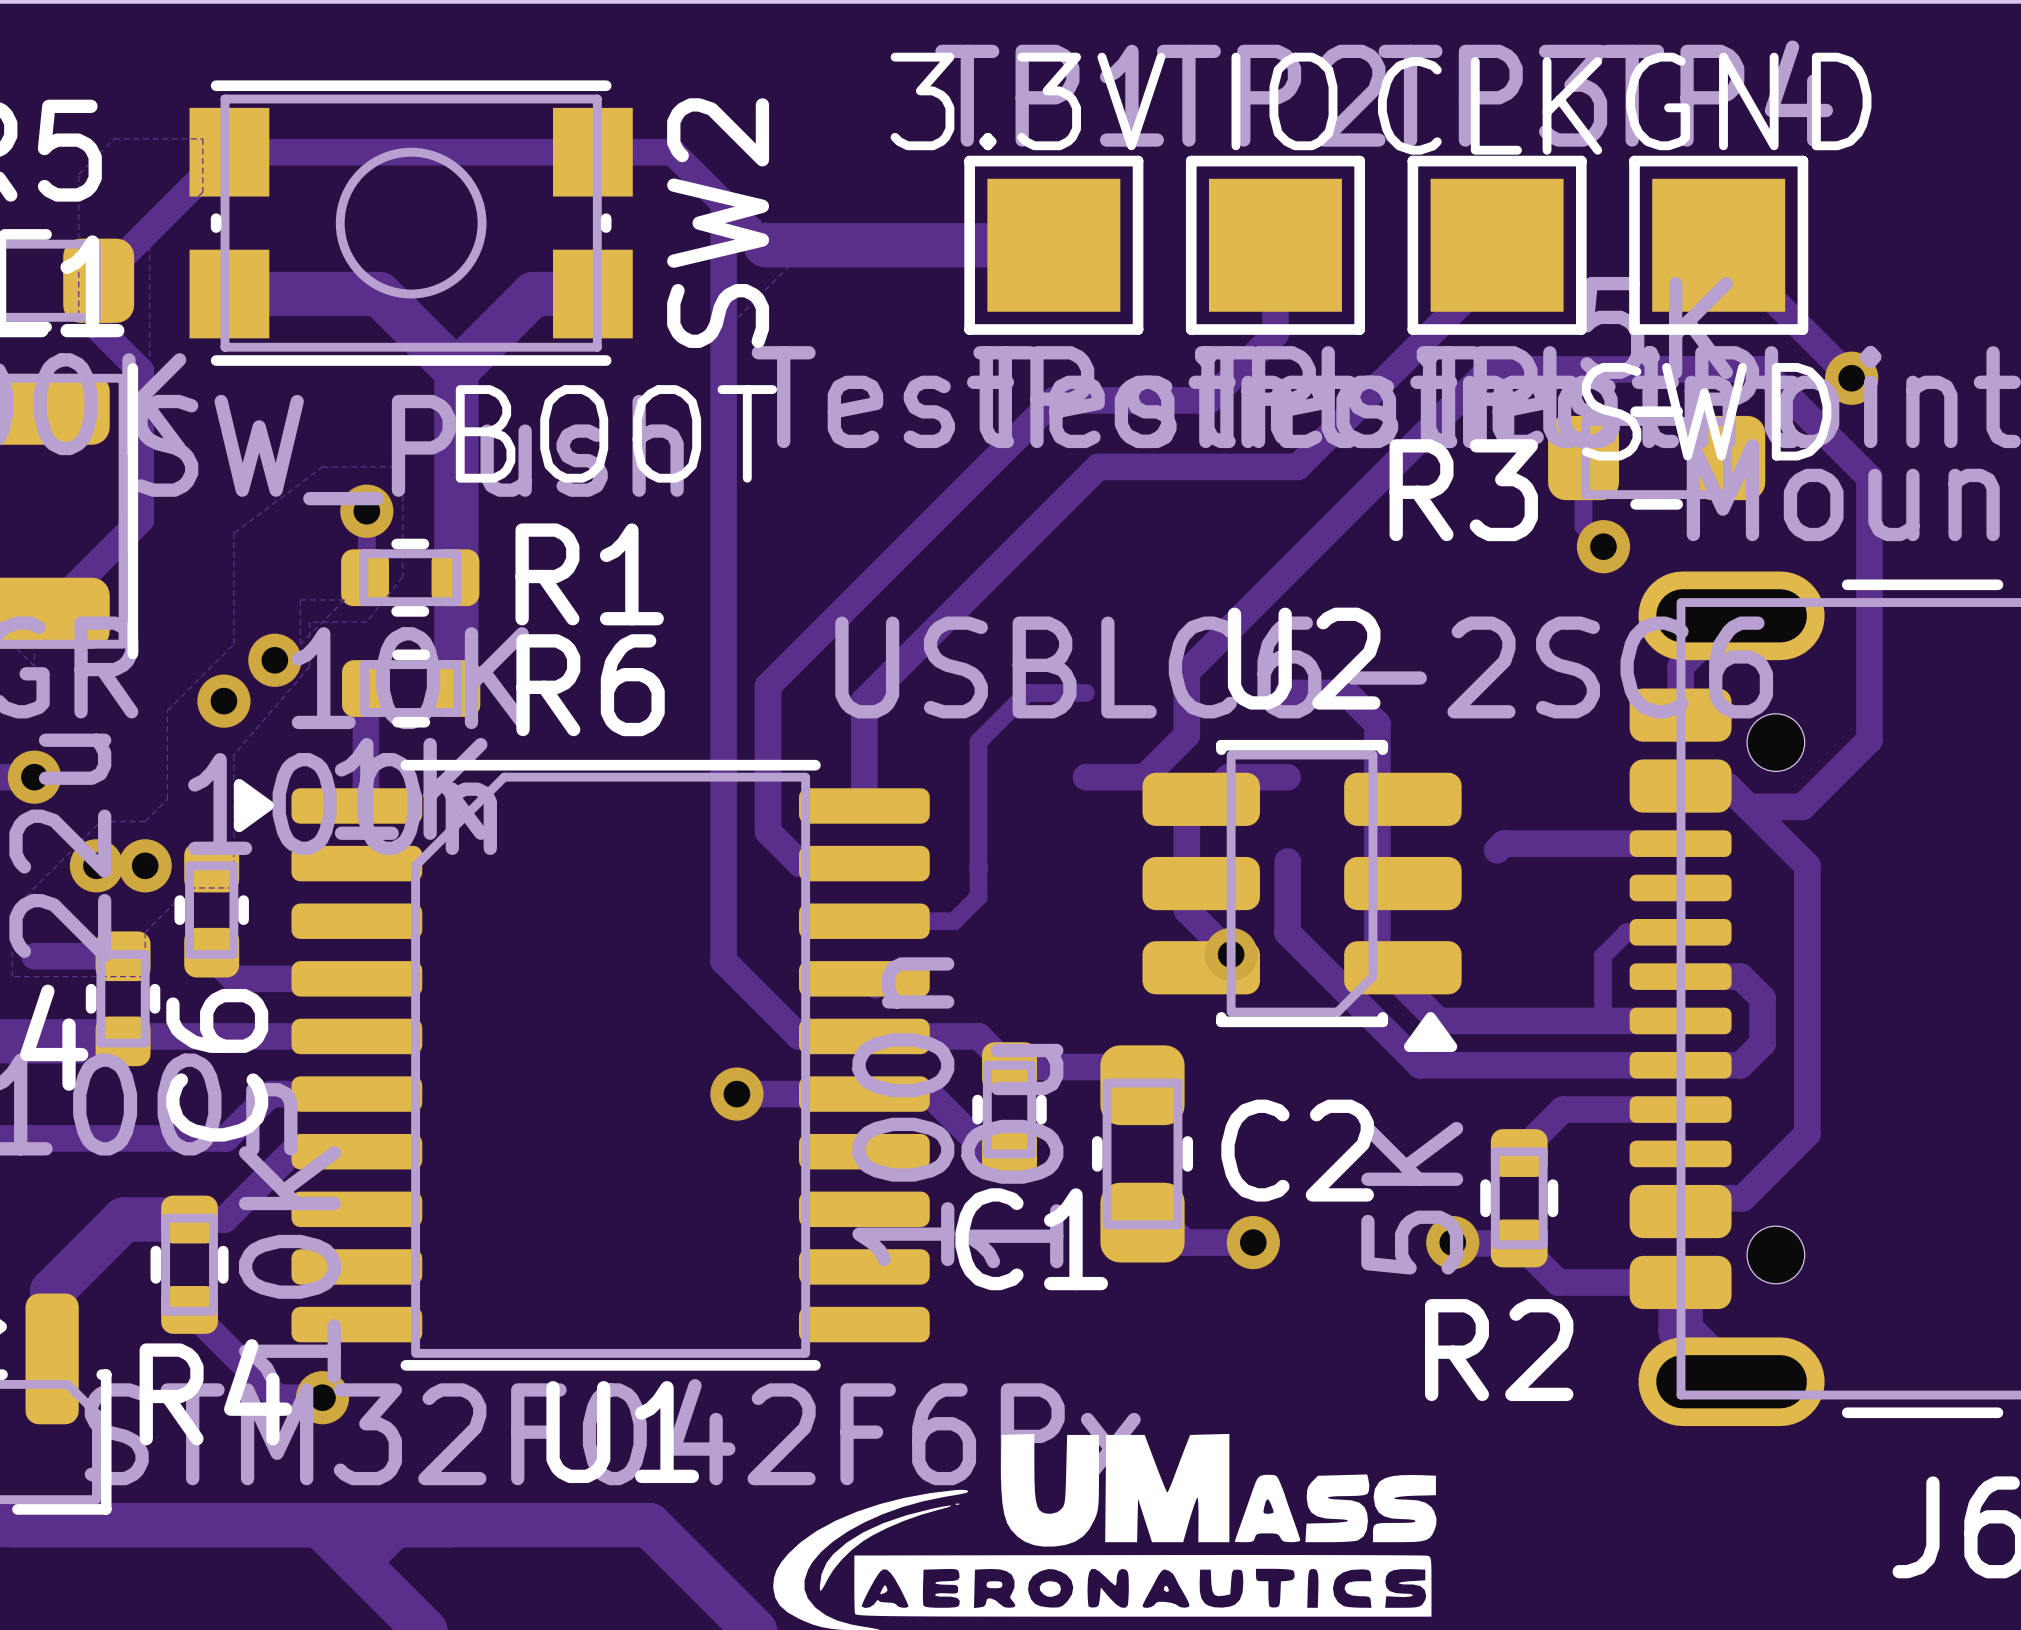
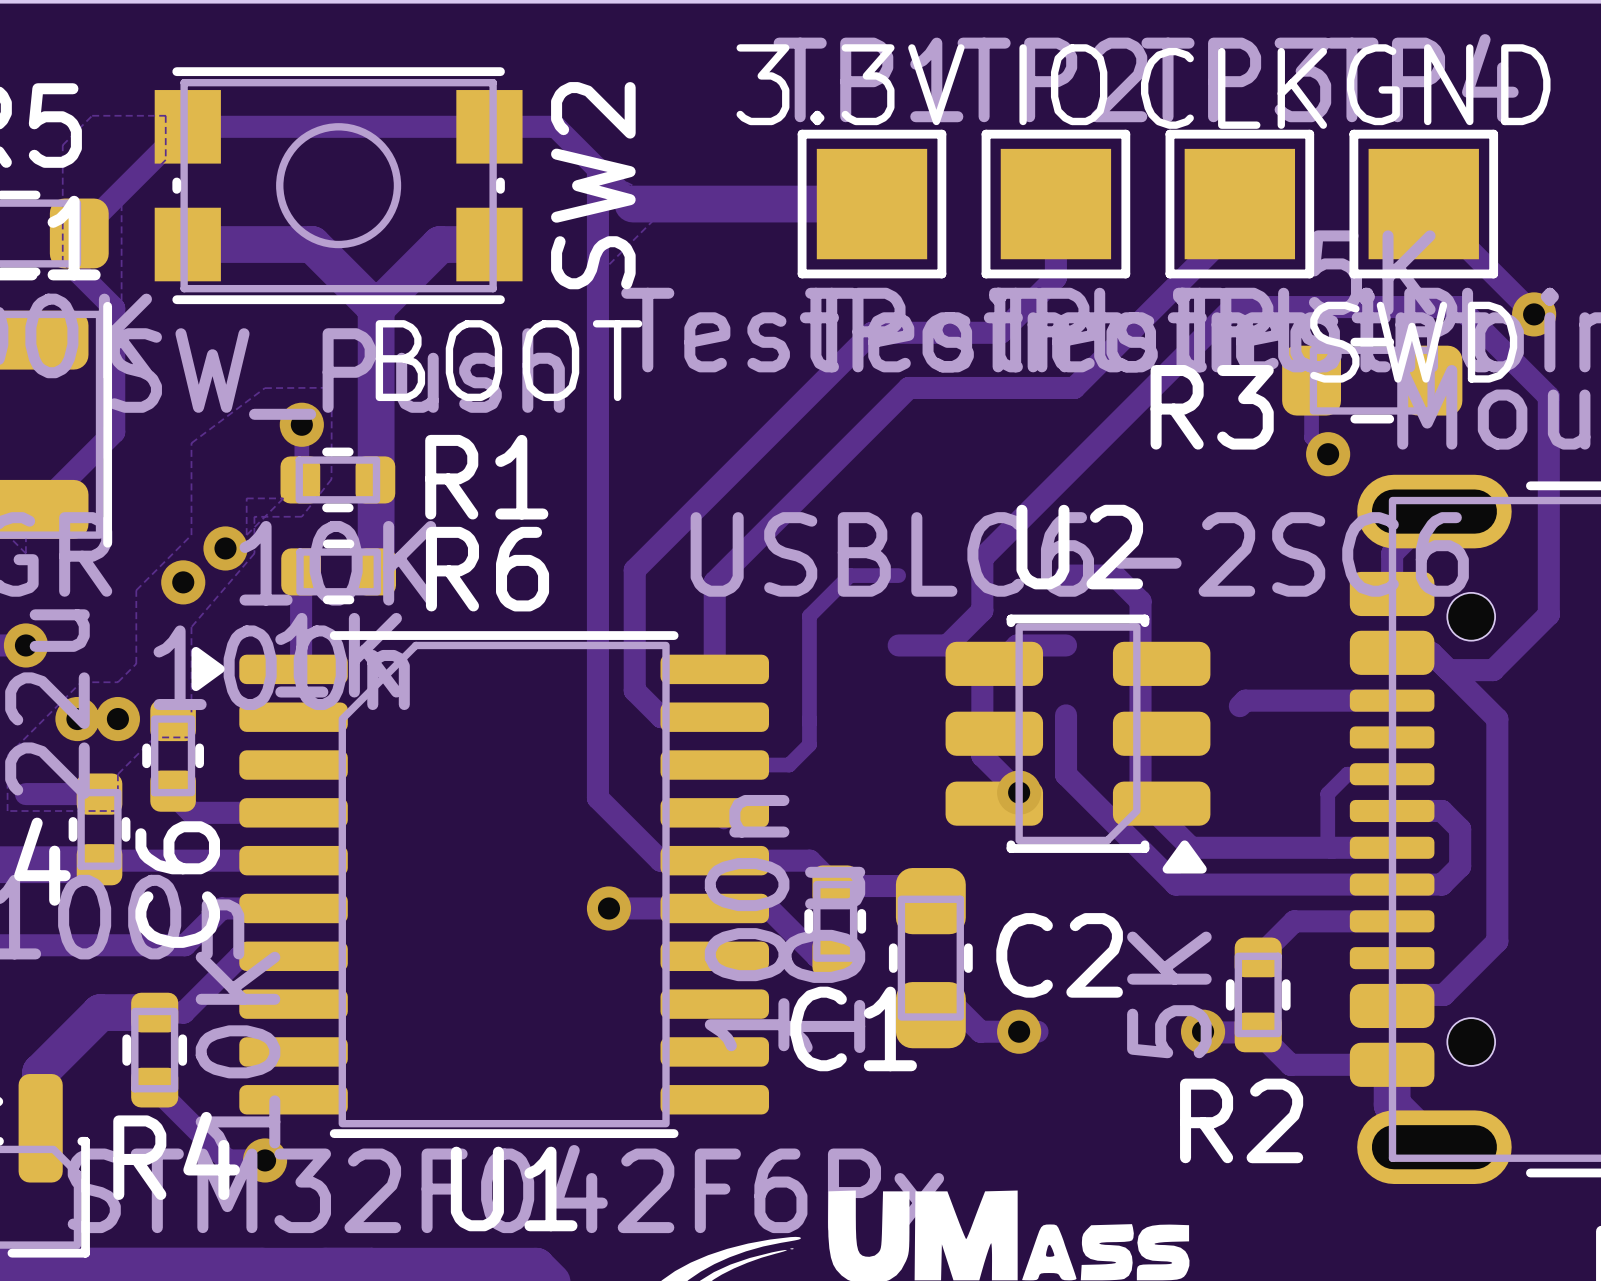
C2 position: (1142, 1153) -> (930, 958)
via position: (1253, 1242) -> (1019, 1031)

